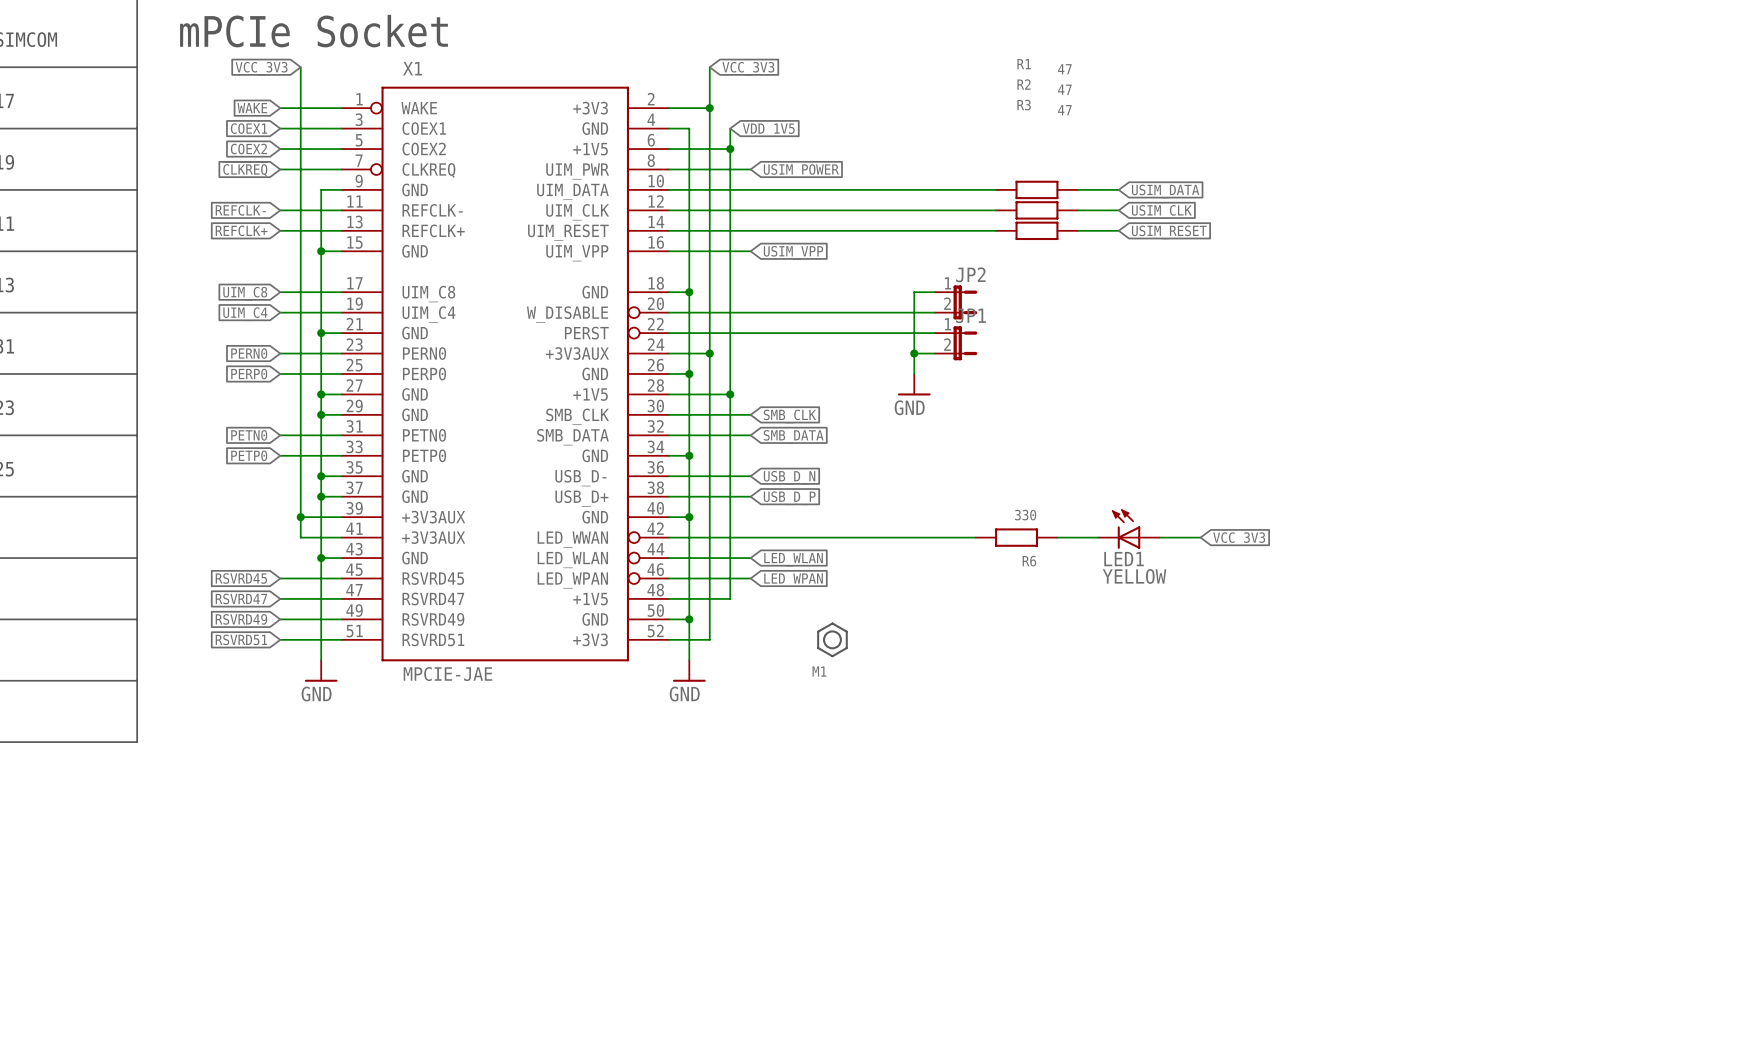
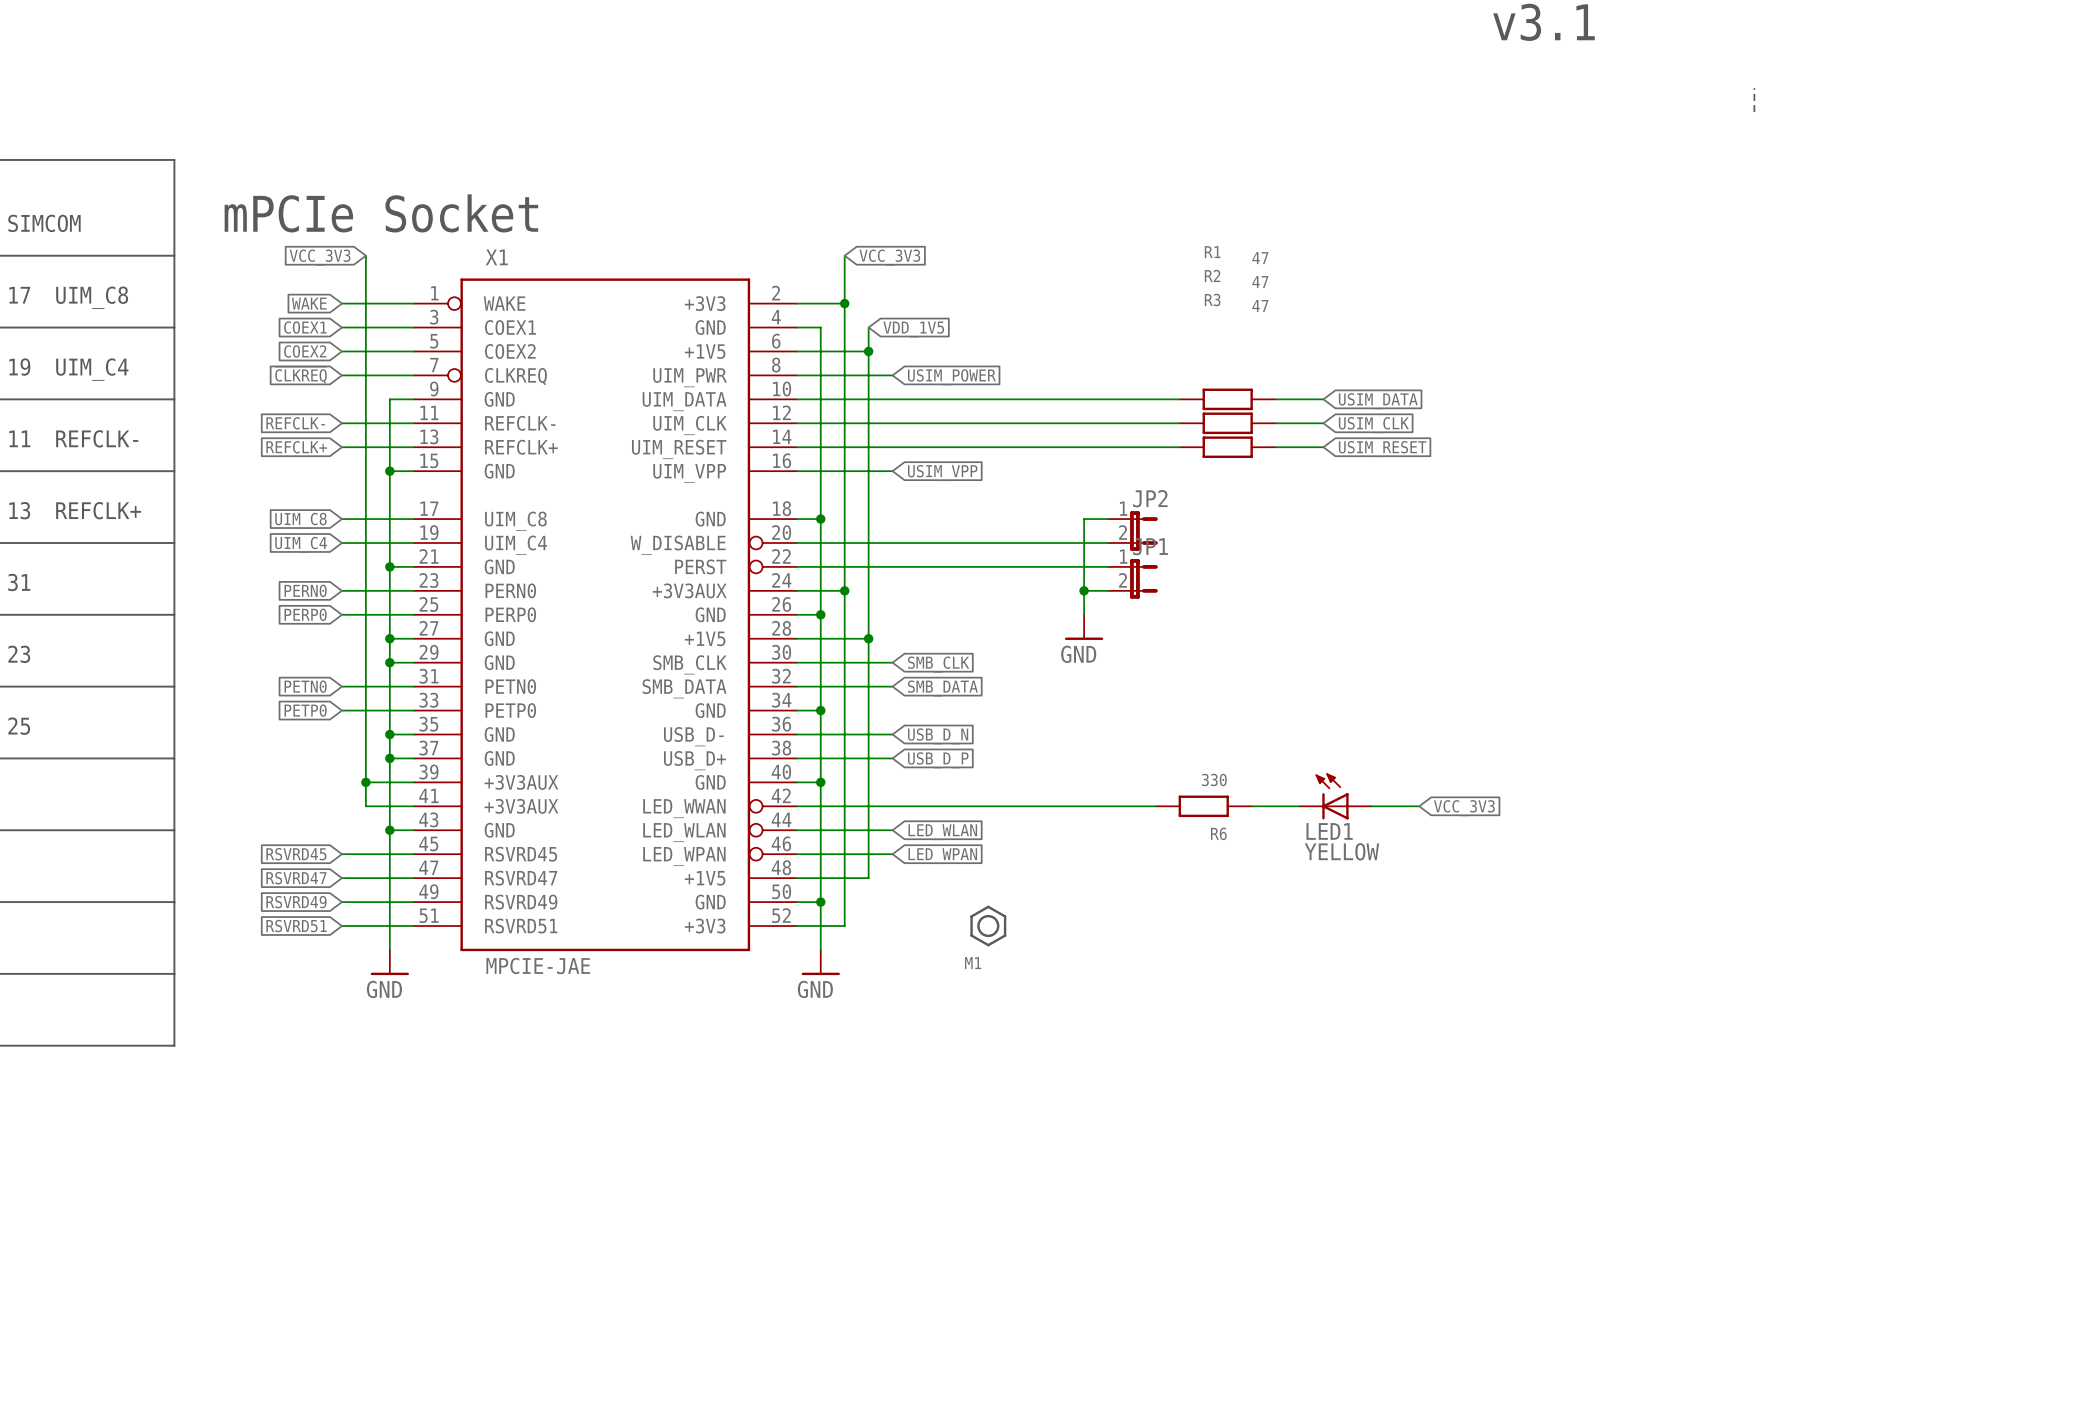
text: none -> UIM_C8 (92, 297)
text: none -> UIM_C4 (92, 369)
text: none -> REFCLK- (97, 438)
text: none -> REFCLK+ (98, 510)

